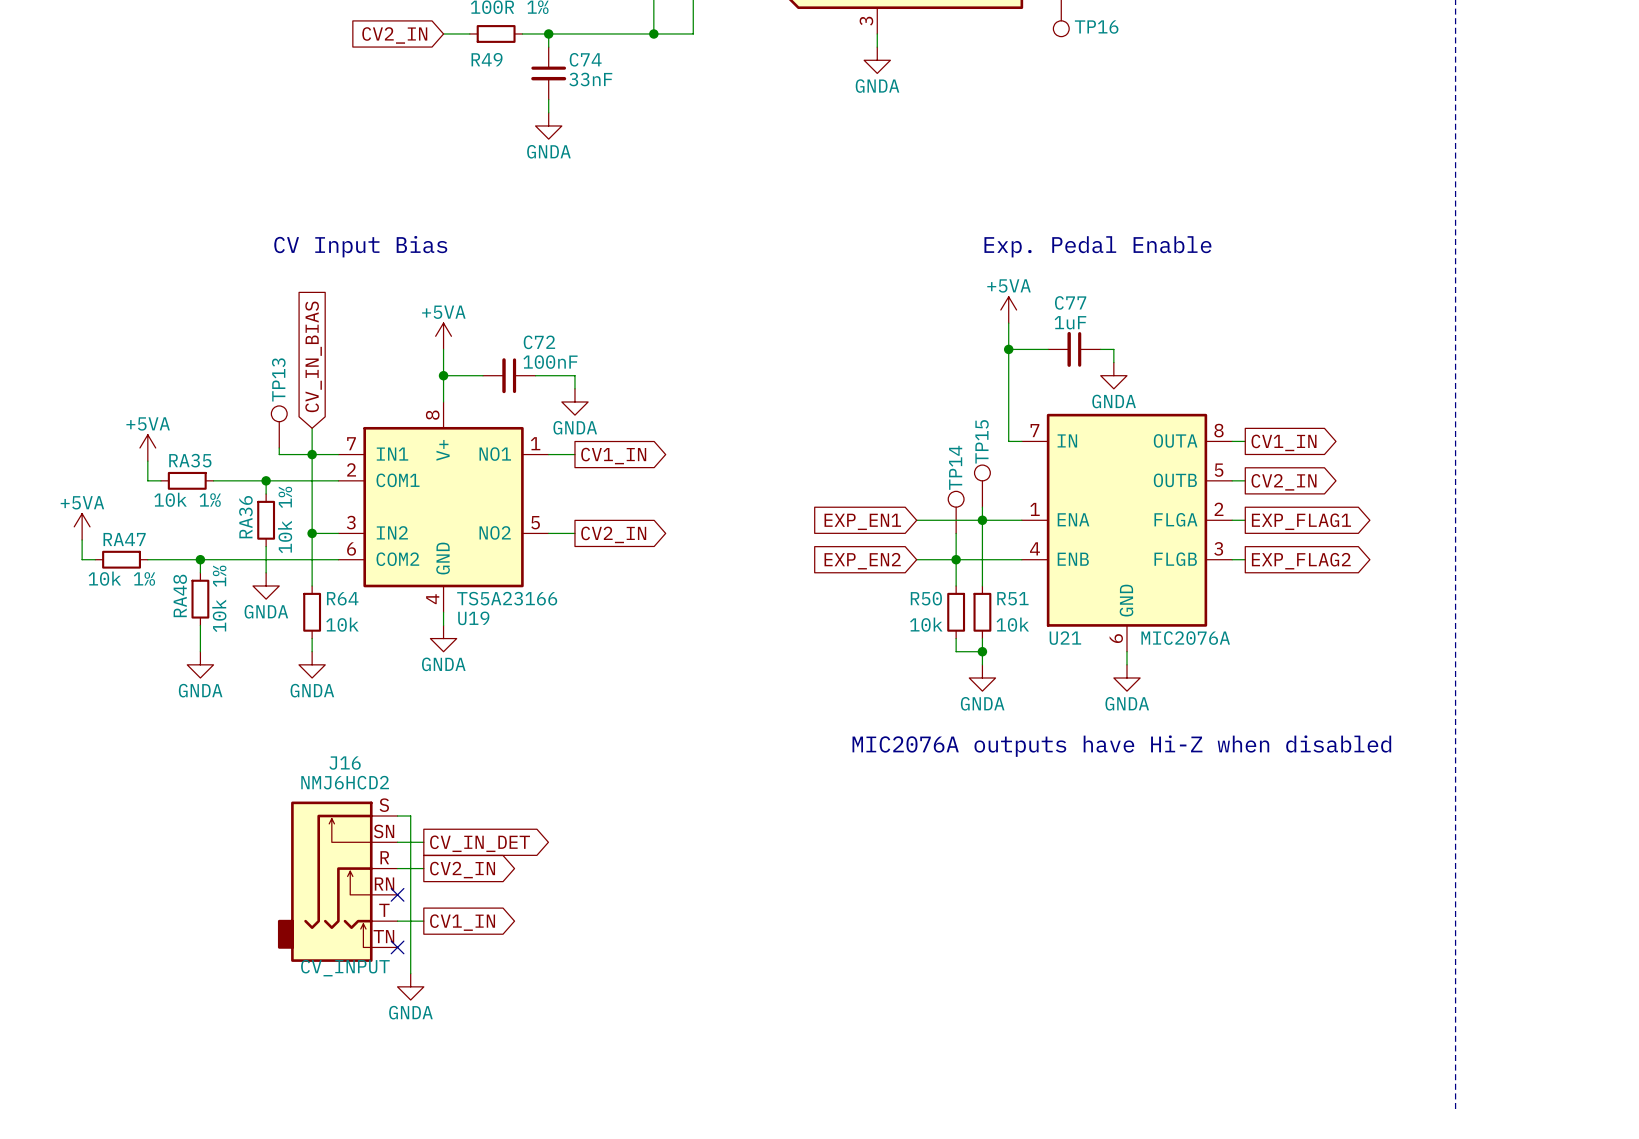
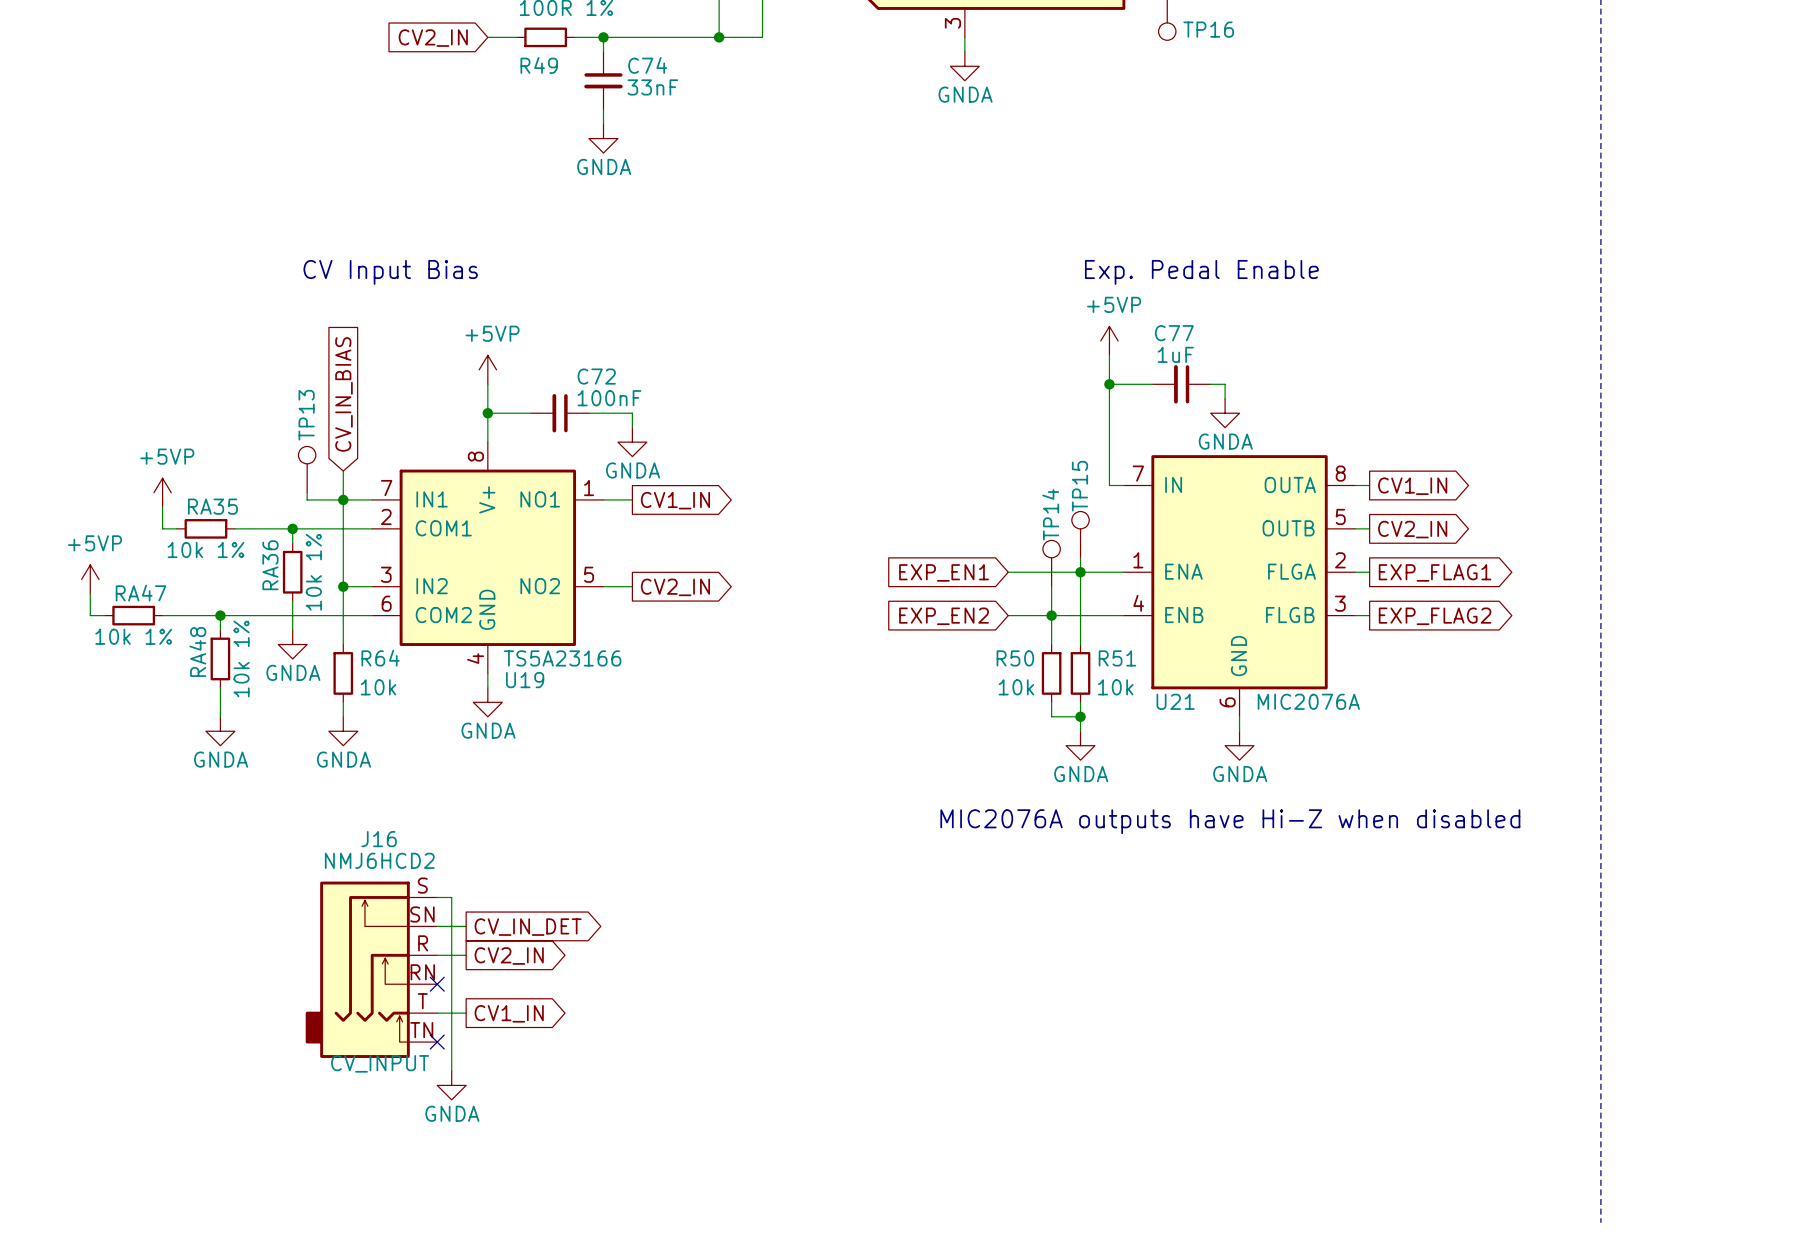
power symbol: +5VA (1008, 309) -> +5VP (1109, 340)
power symbol: +5VA (443, 336) -> +5VP (487, 369)
power symbol: +5VA (147, 447) -> +5VP (162, 492)
power symbol: +5VA (82, 526) -> +5VP (90, 579)

